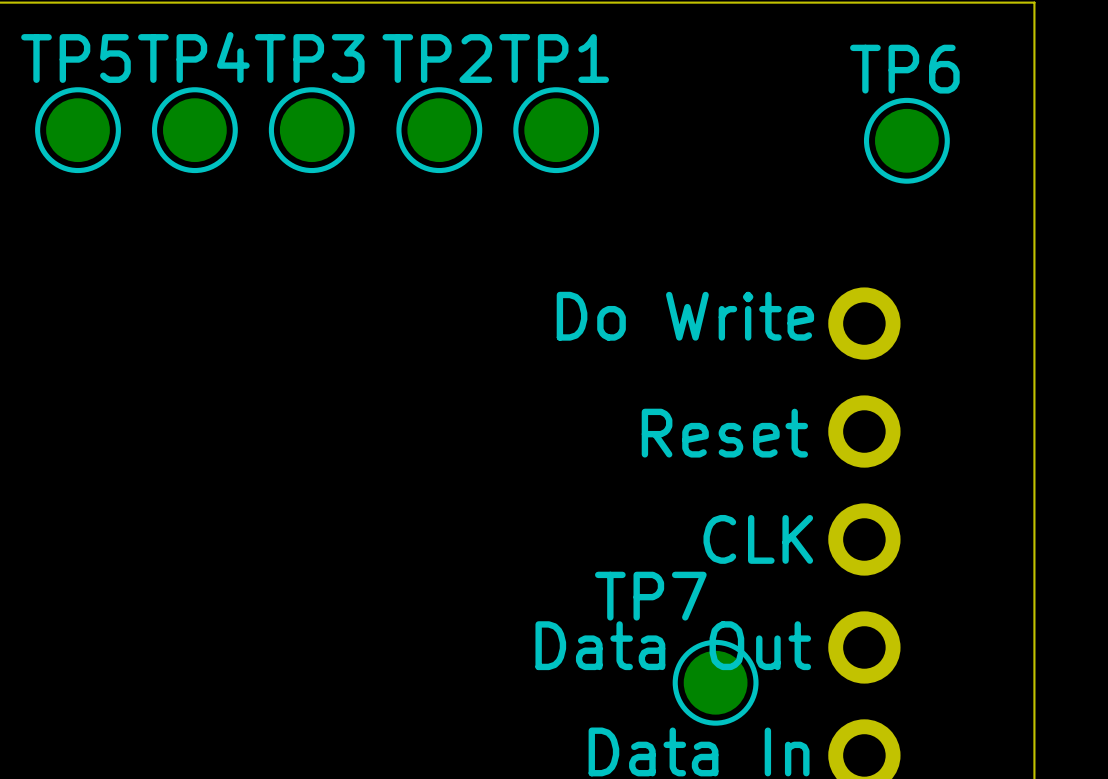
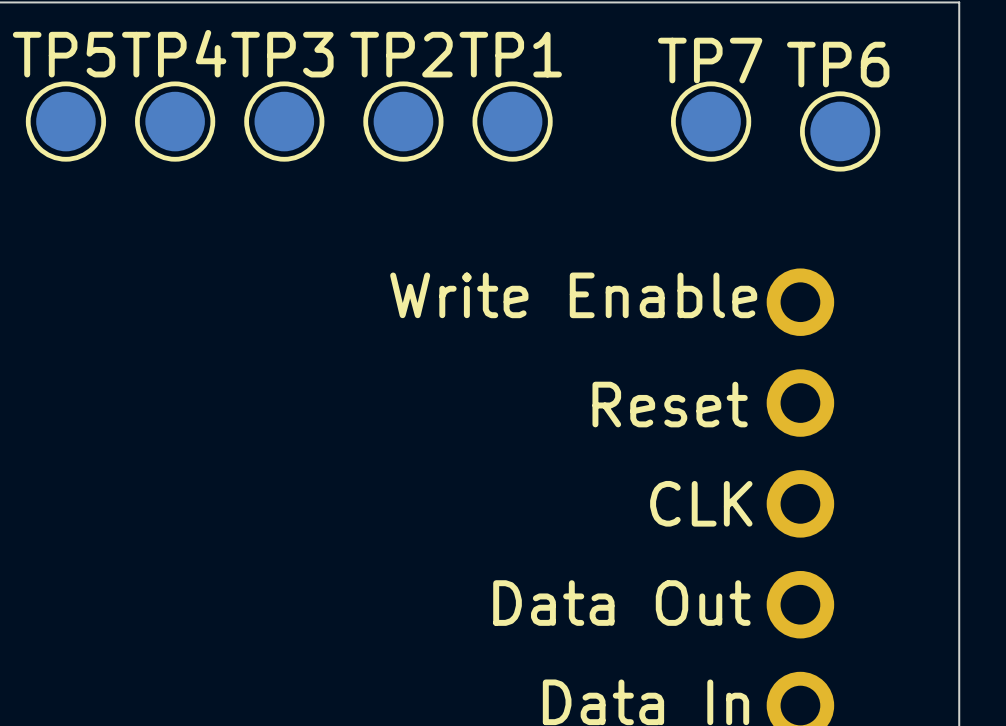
text: none -> Write Enable (573, 295)
text: Do Write (685, 316) -> none
TP7 name position: TP7 (650, 596) -> TP7 (710, 60)
TP7 position: (715, 682) -> (711, 121)

